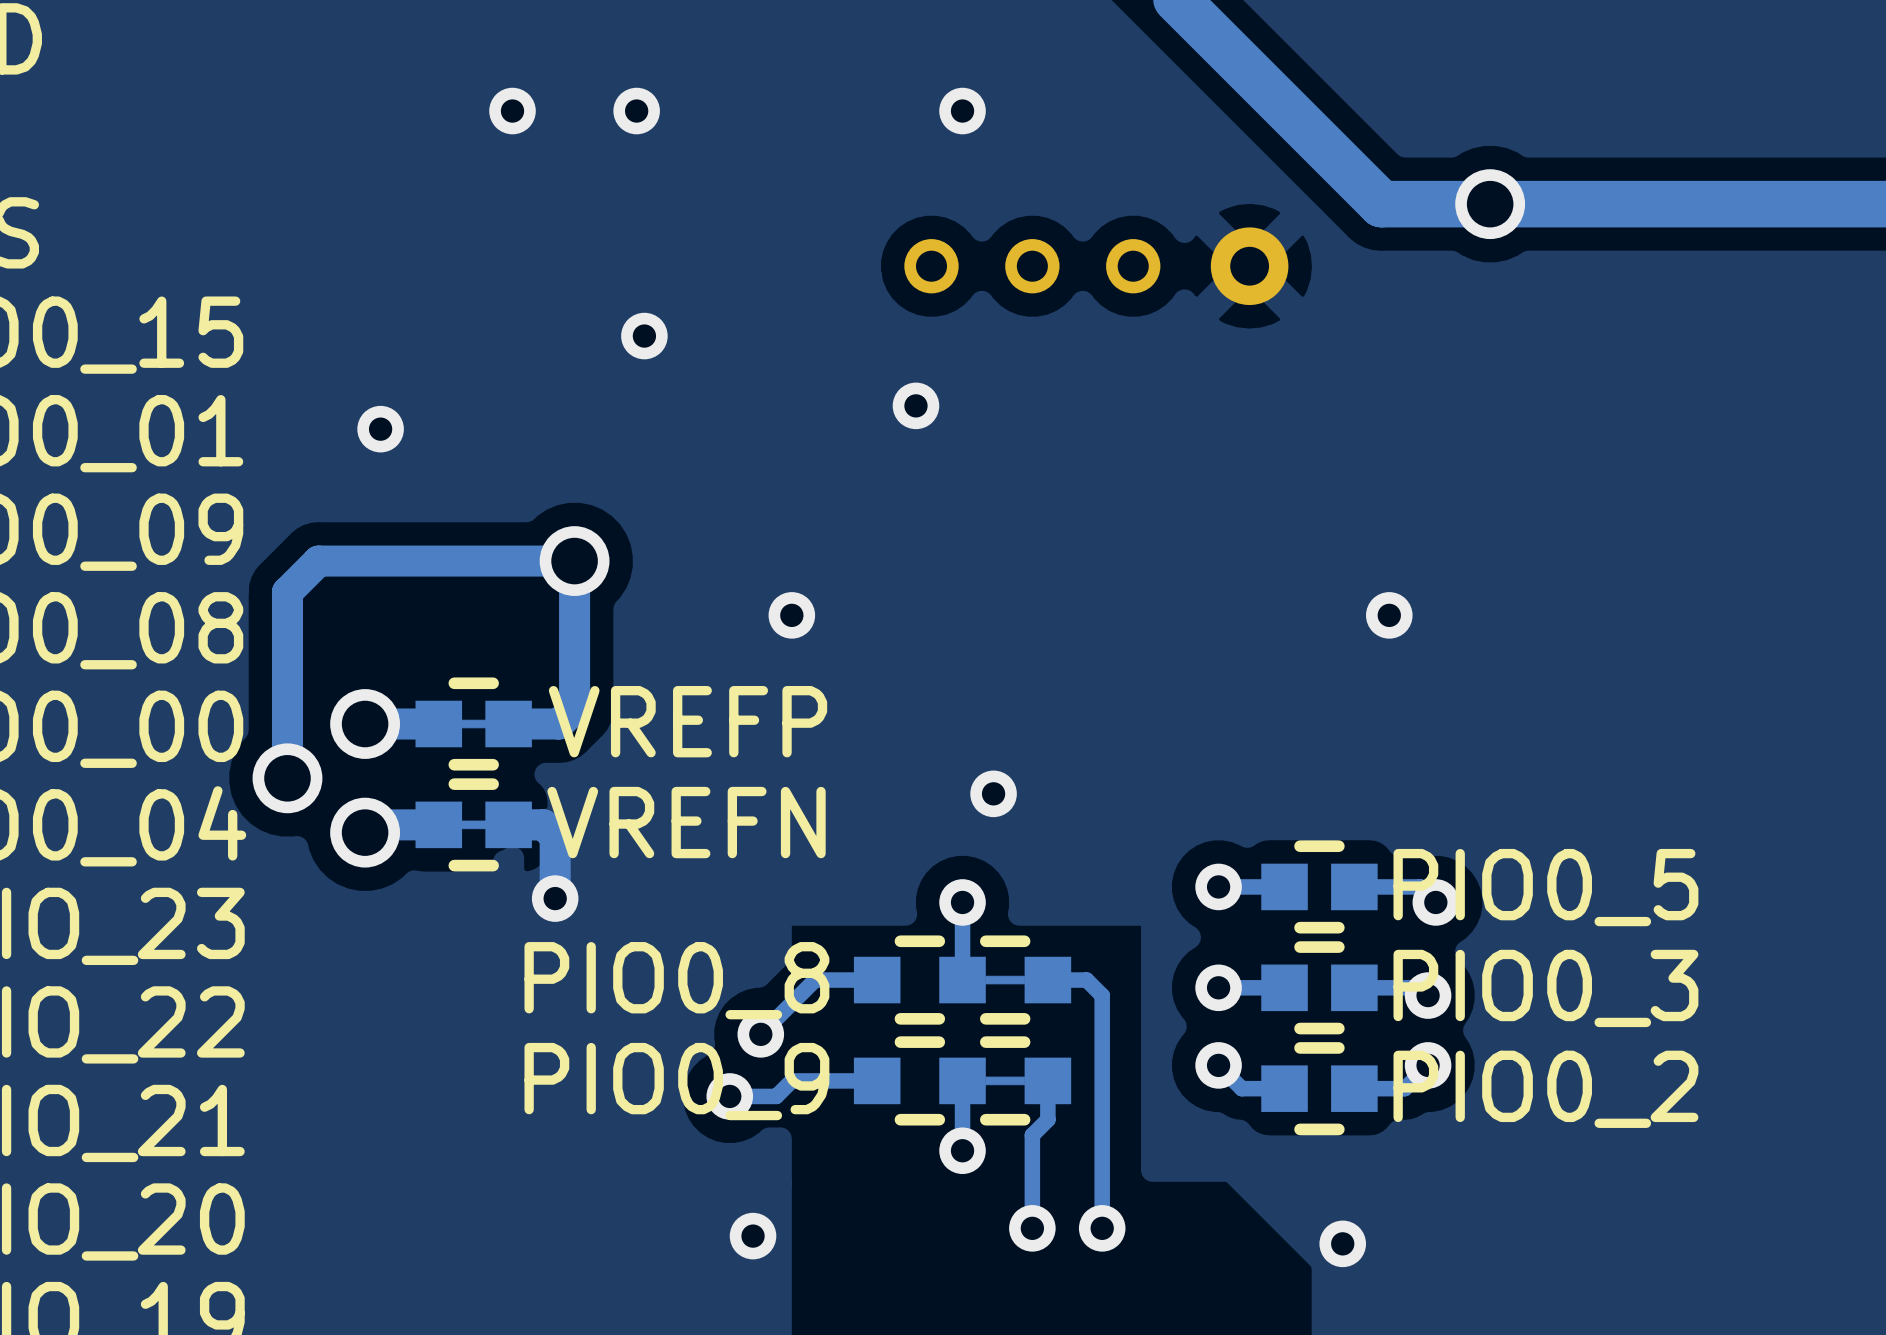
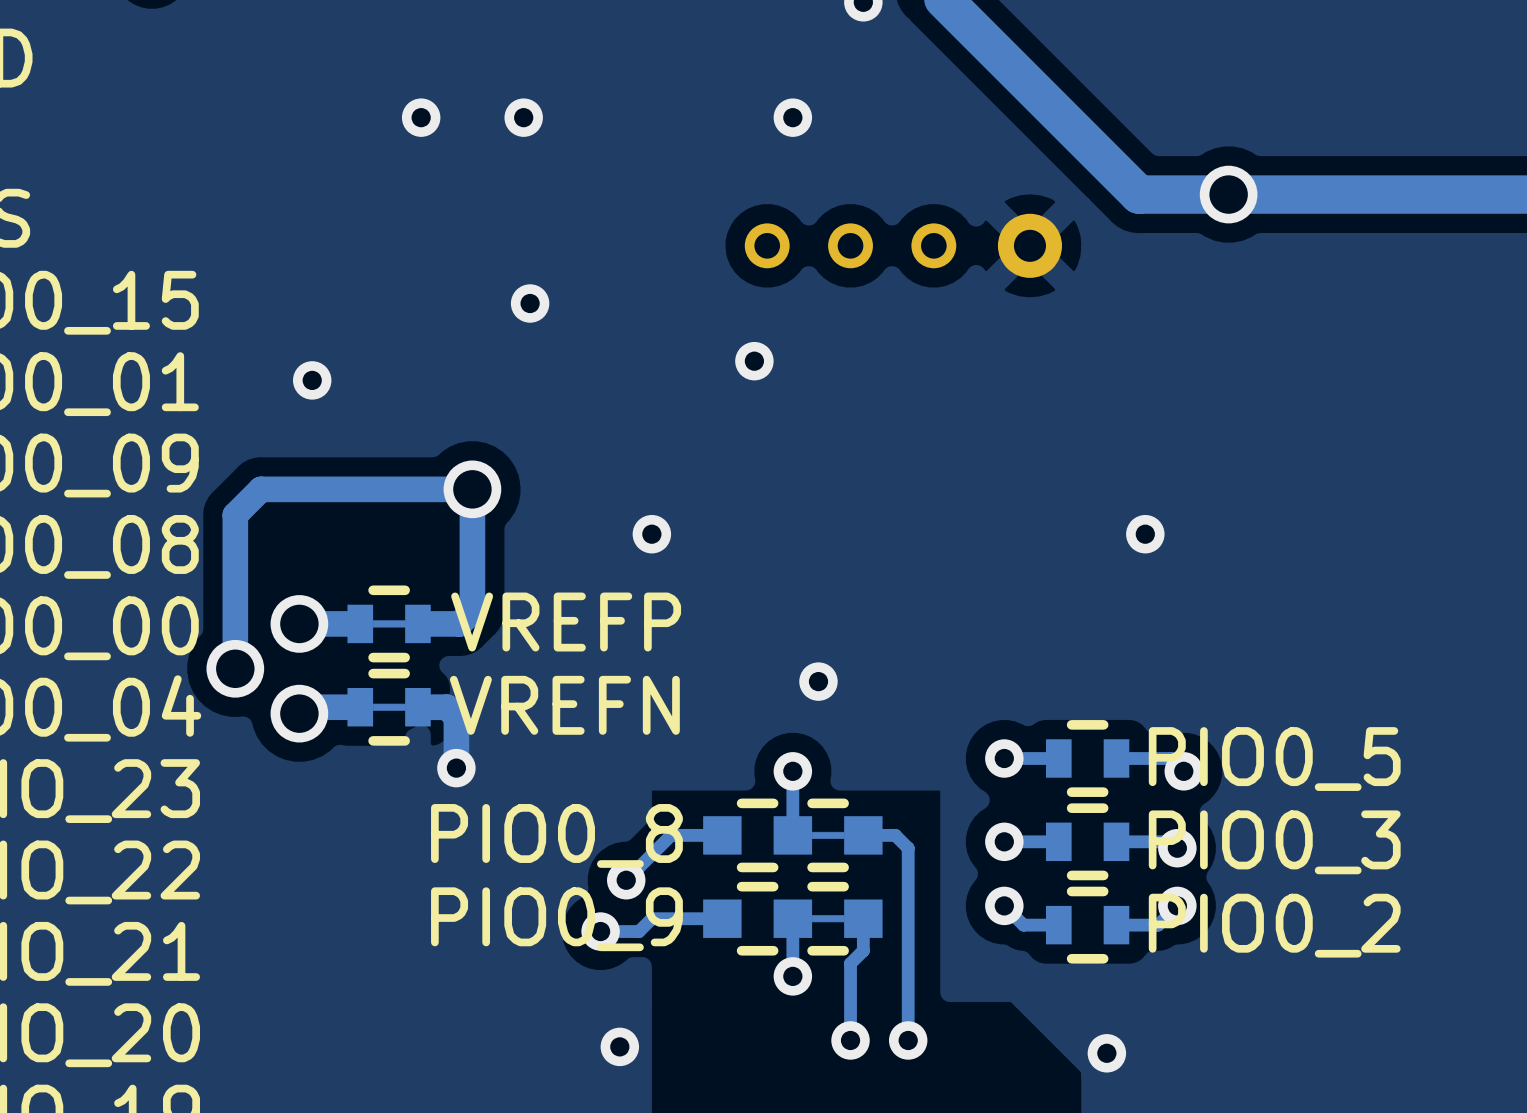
part footprint: [415, 677, 532, 771] -> [347, 585, 431, 663]
part footprint: [415, 778, 532, 872] -> [347, 668, 431, 746]
part footprint: [1261, 840, 1378, 934] -> [1045, 720, 1130, 797]
part footprint: [1261, 941, 1378, 1035] -> [1045, 803, 1130, 881]
part footprint: [1261, 1042, 1378, 1136] -> [1045, 886, 1130, 964]

